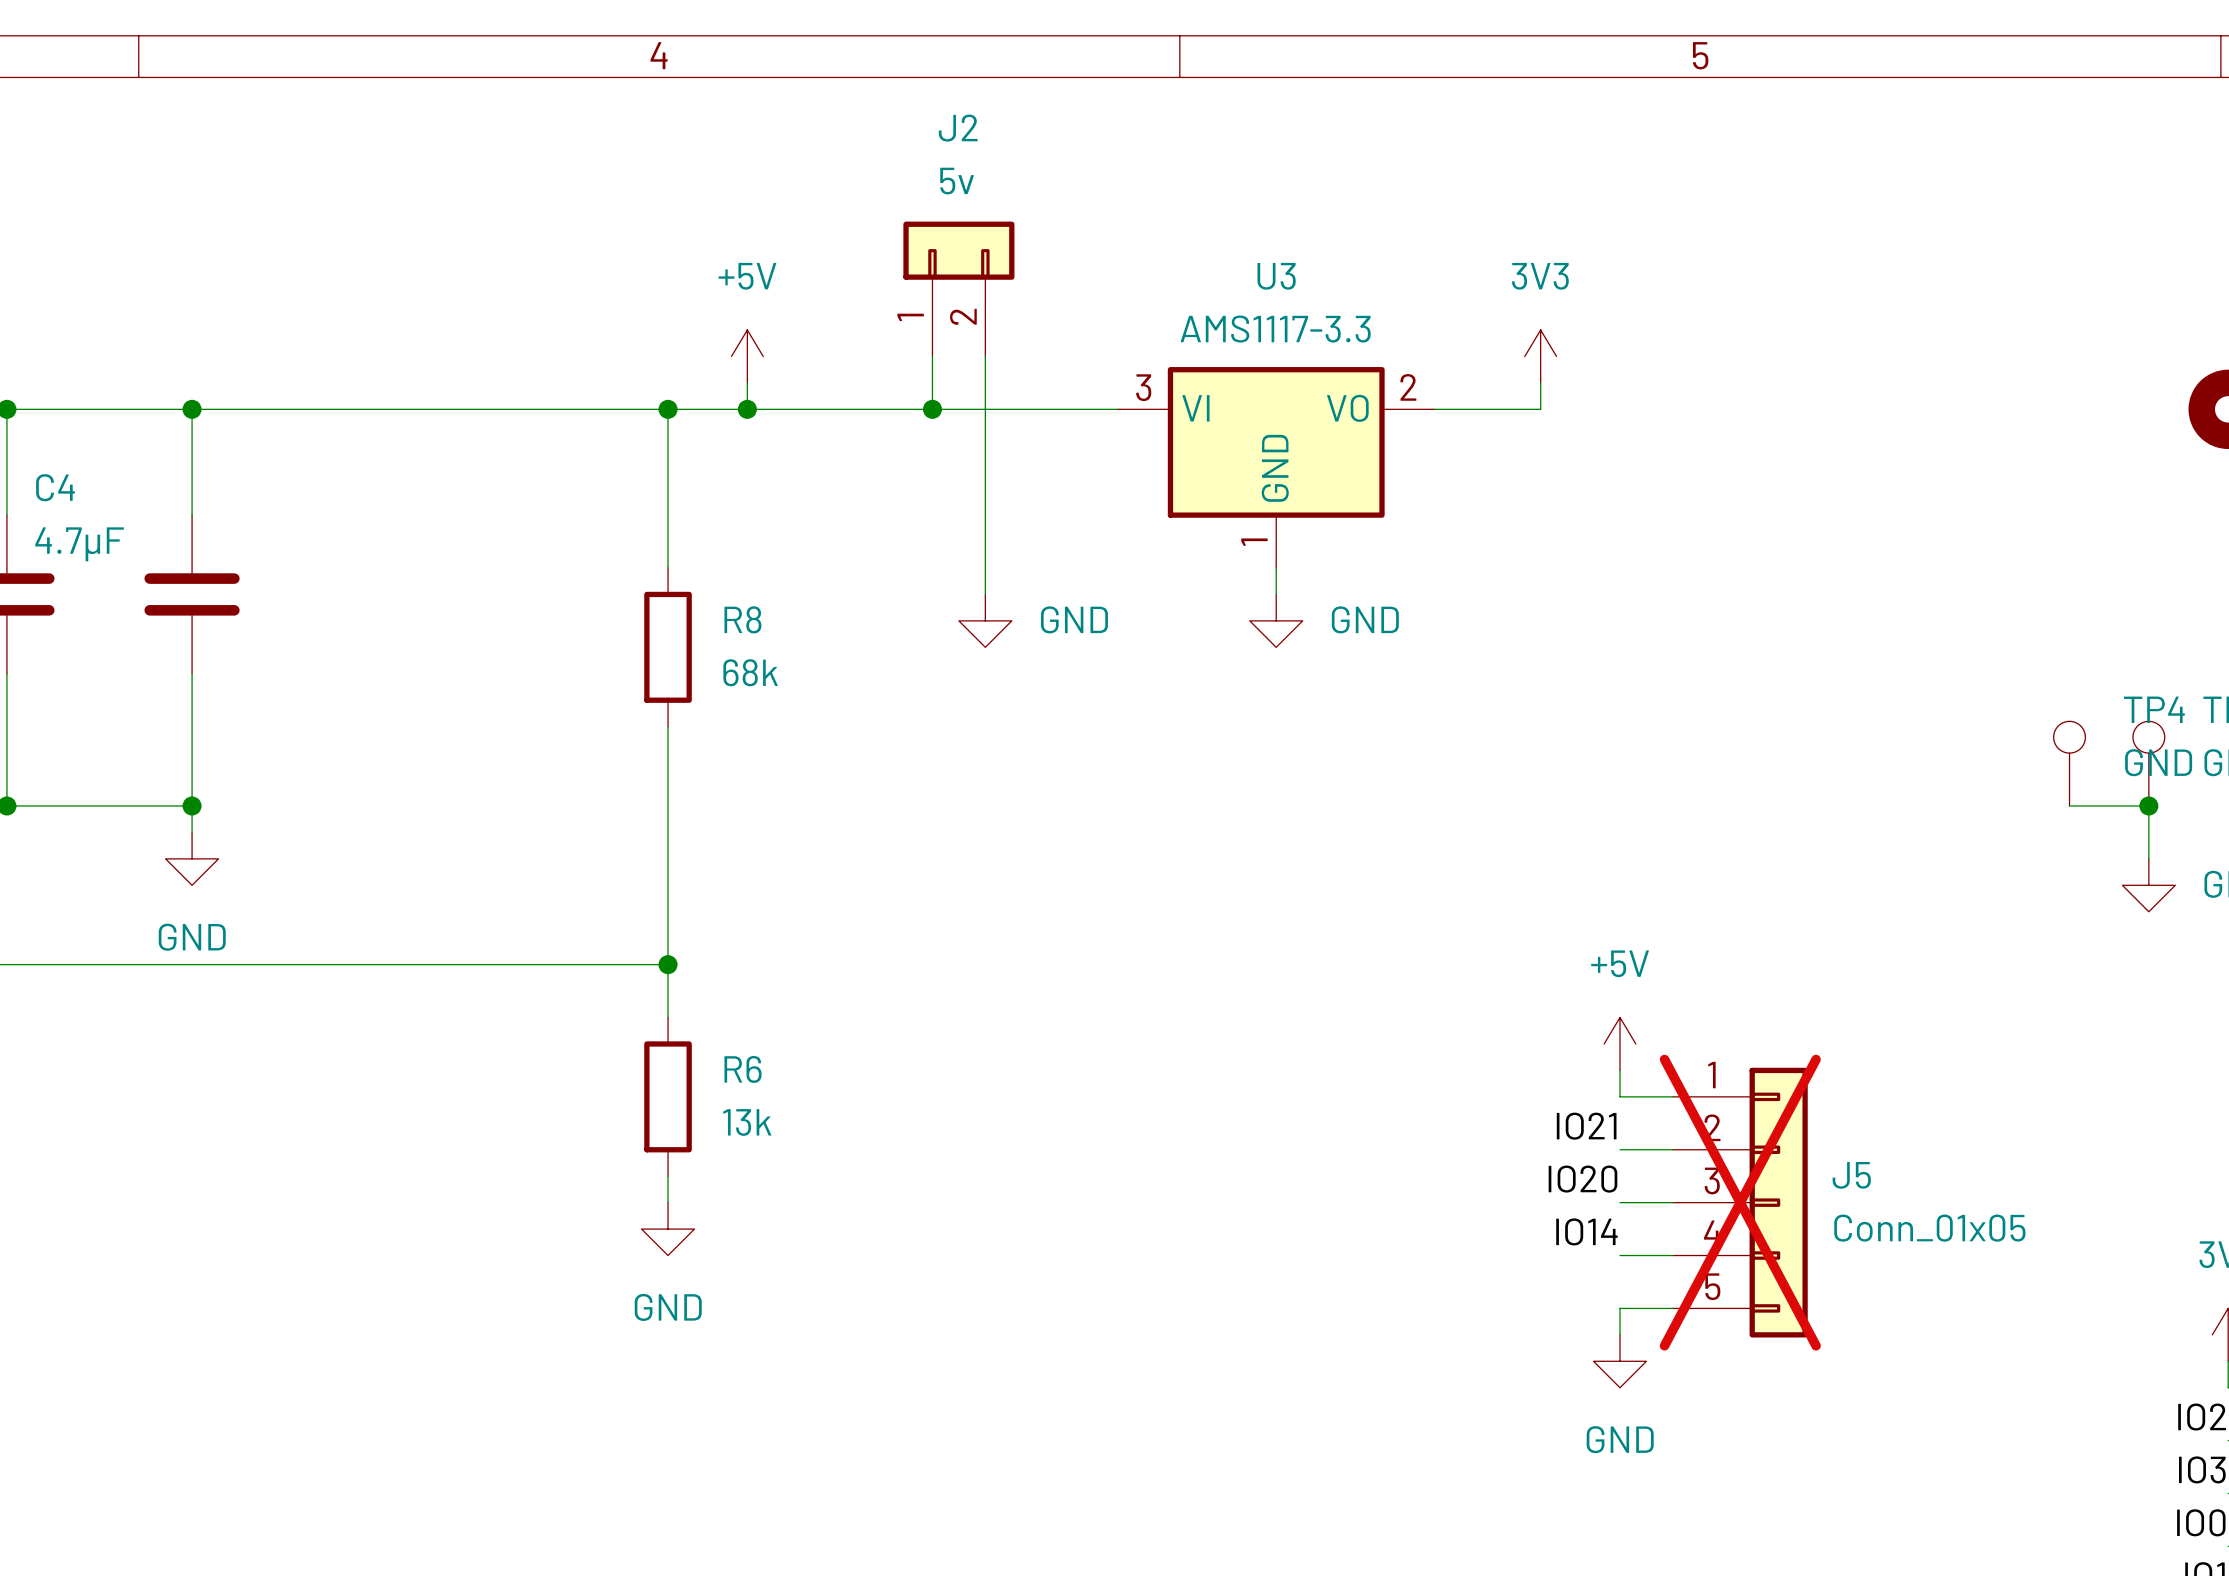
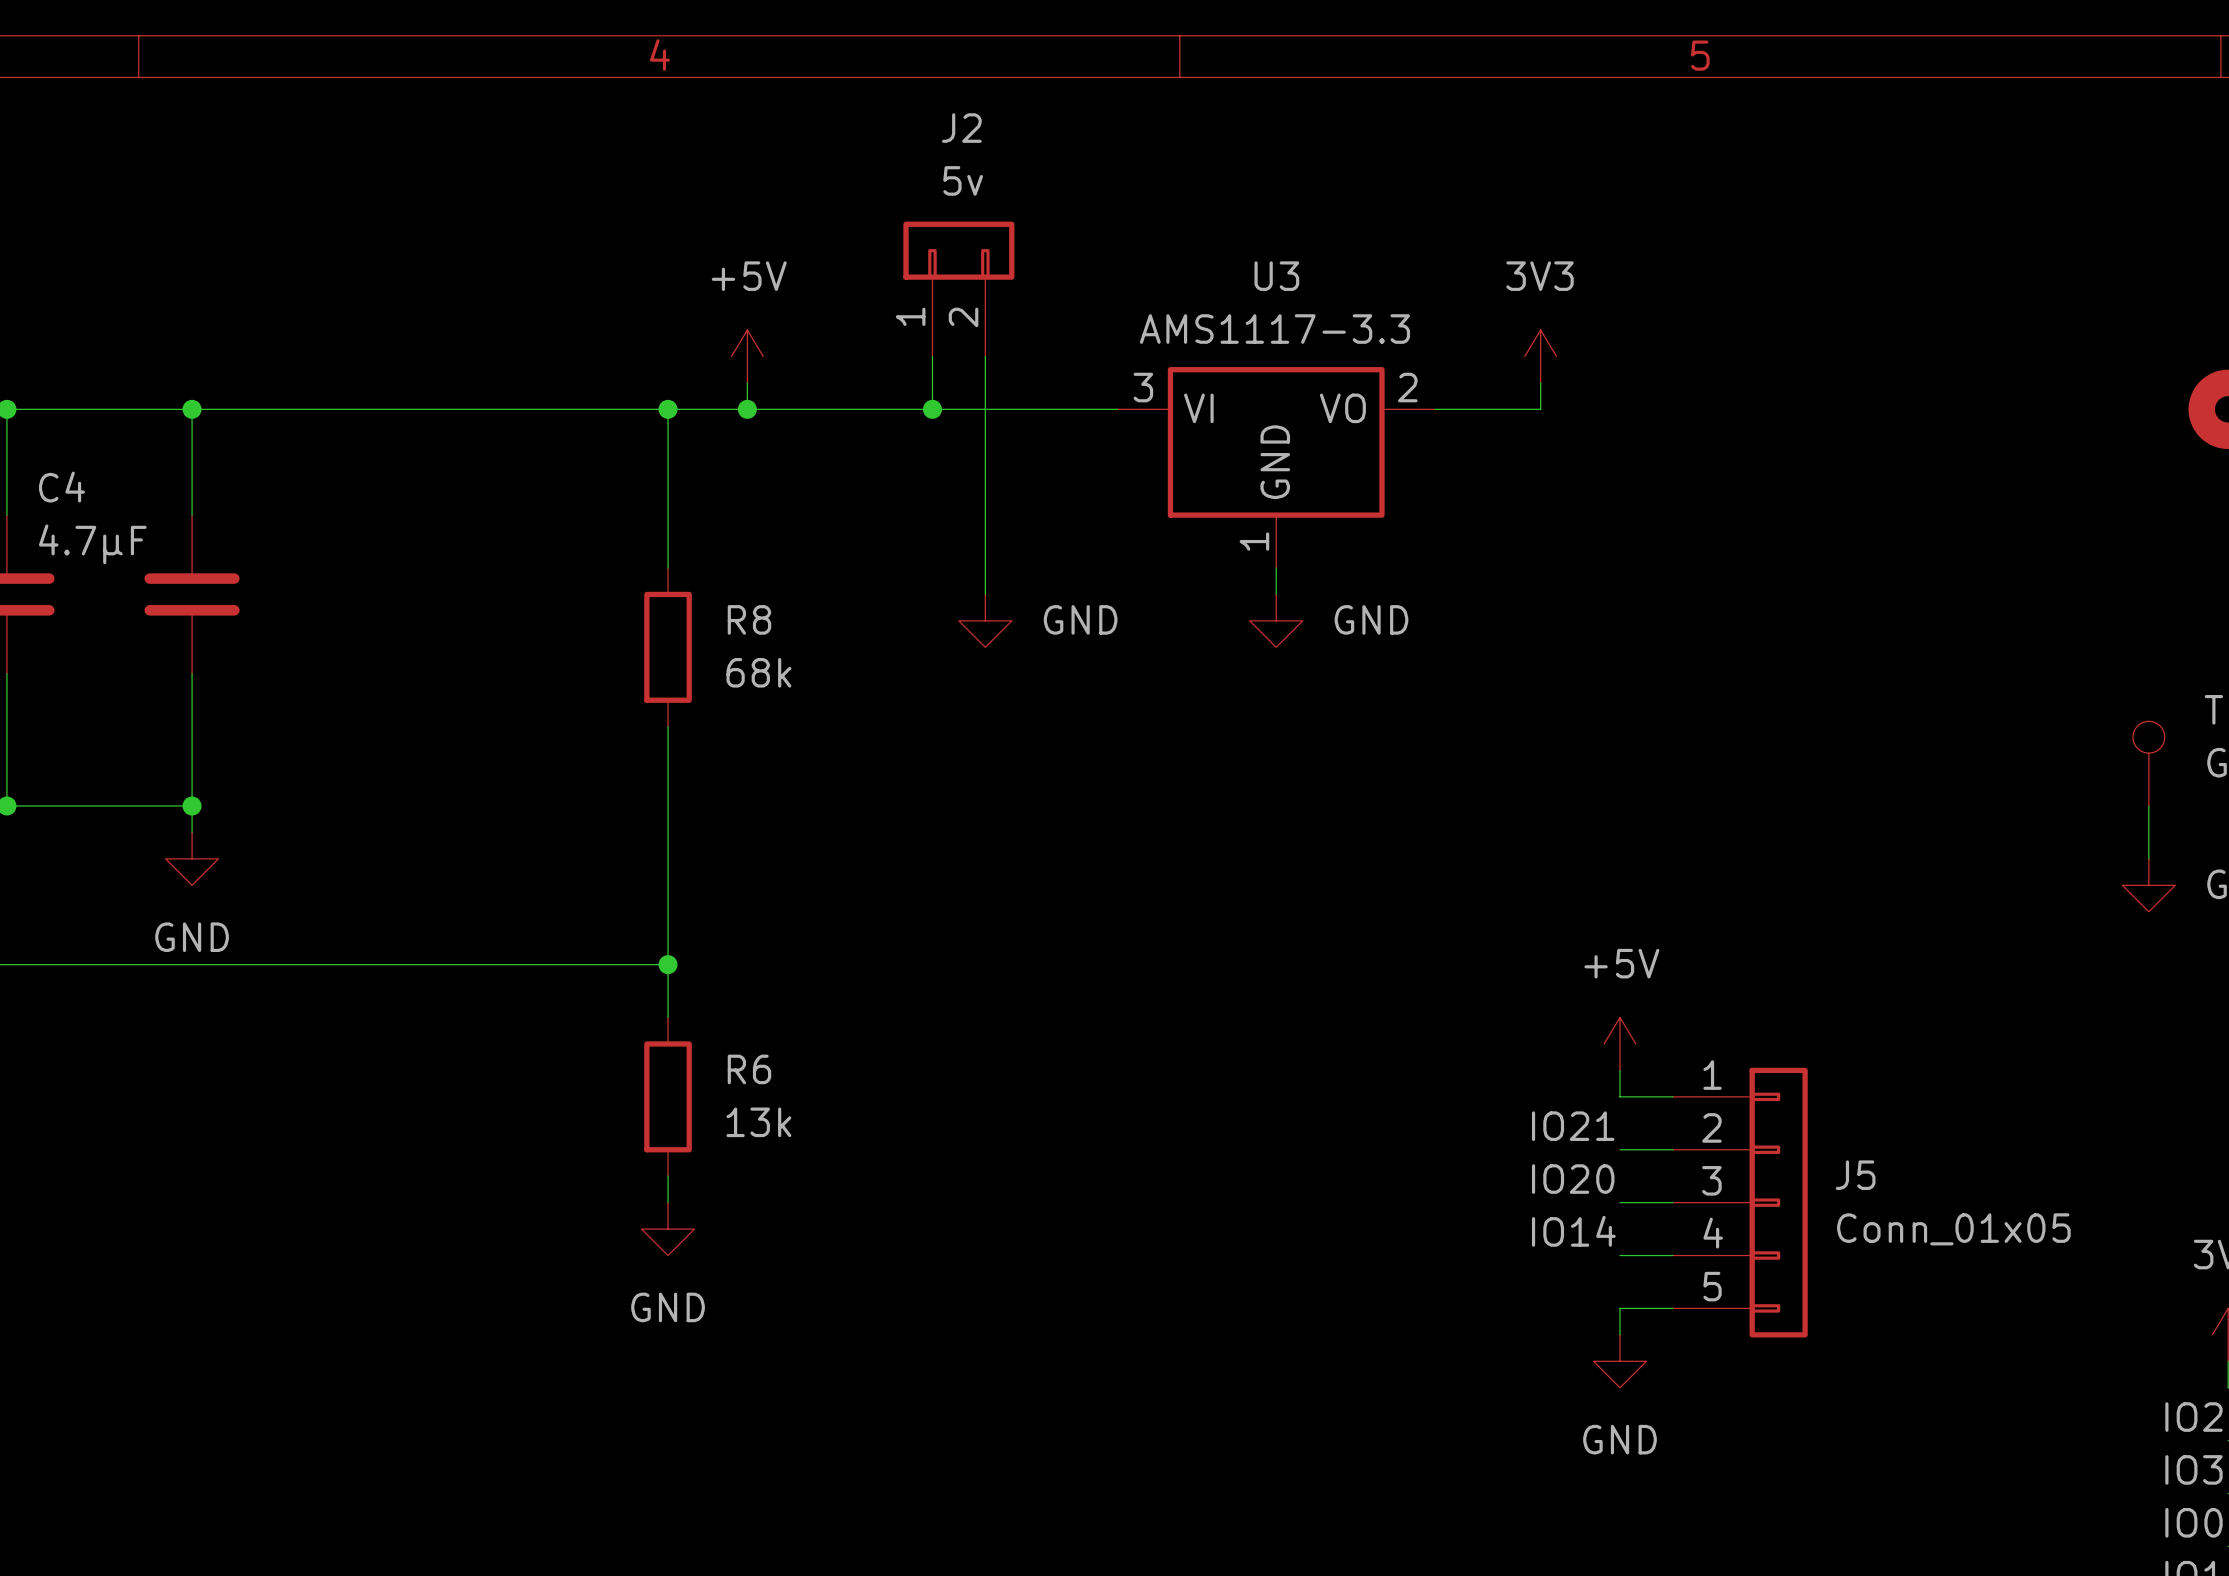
TP4: GND (2069, 763) -> none
wire: (2069, 805) (2148, 805) -> none
junction: (2148, 805) -> none
J5 do-not-place cross: (1740, 1202) -> none

